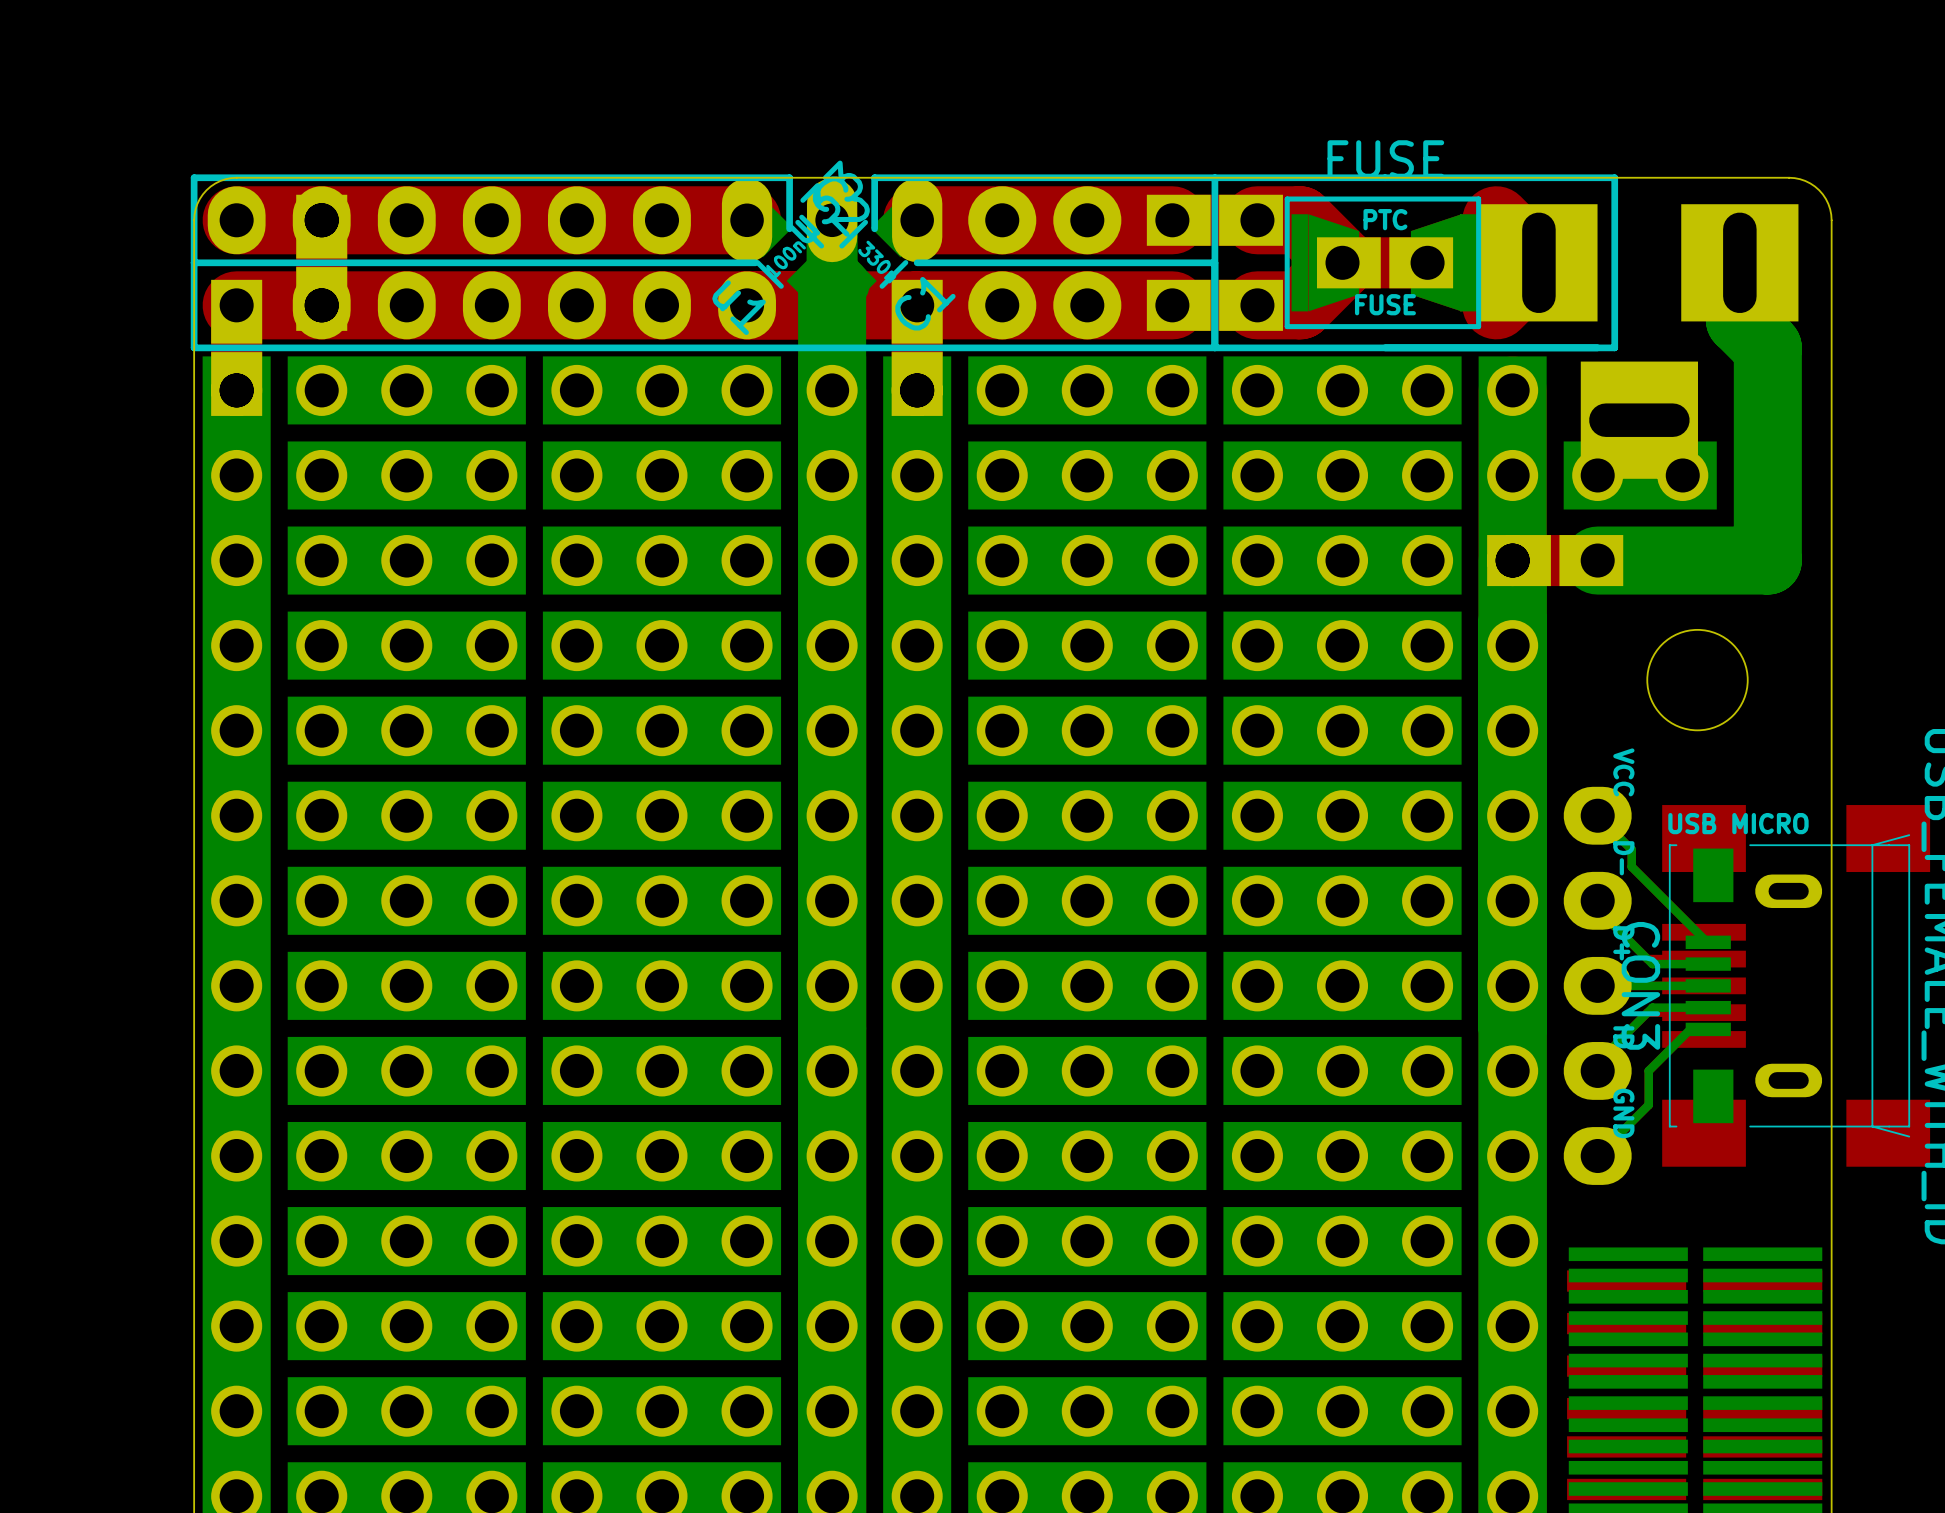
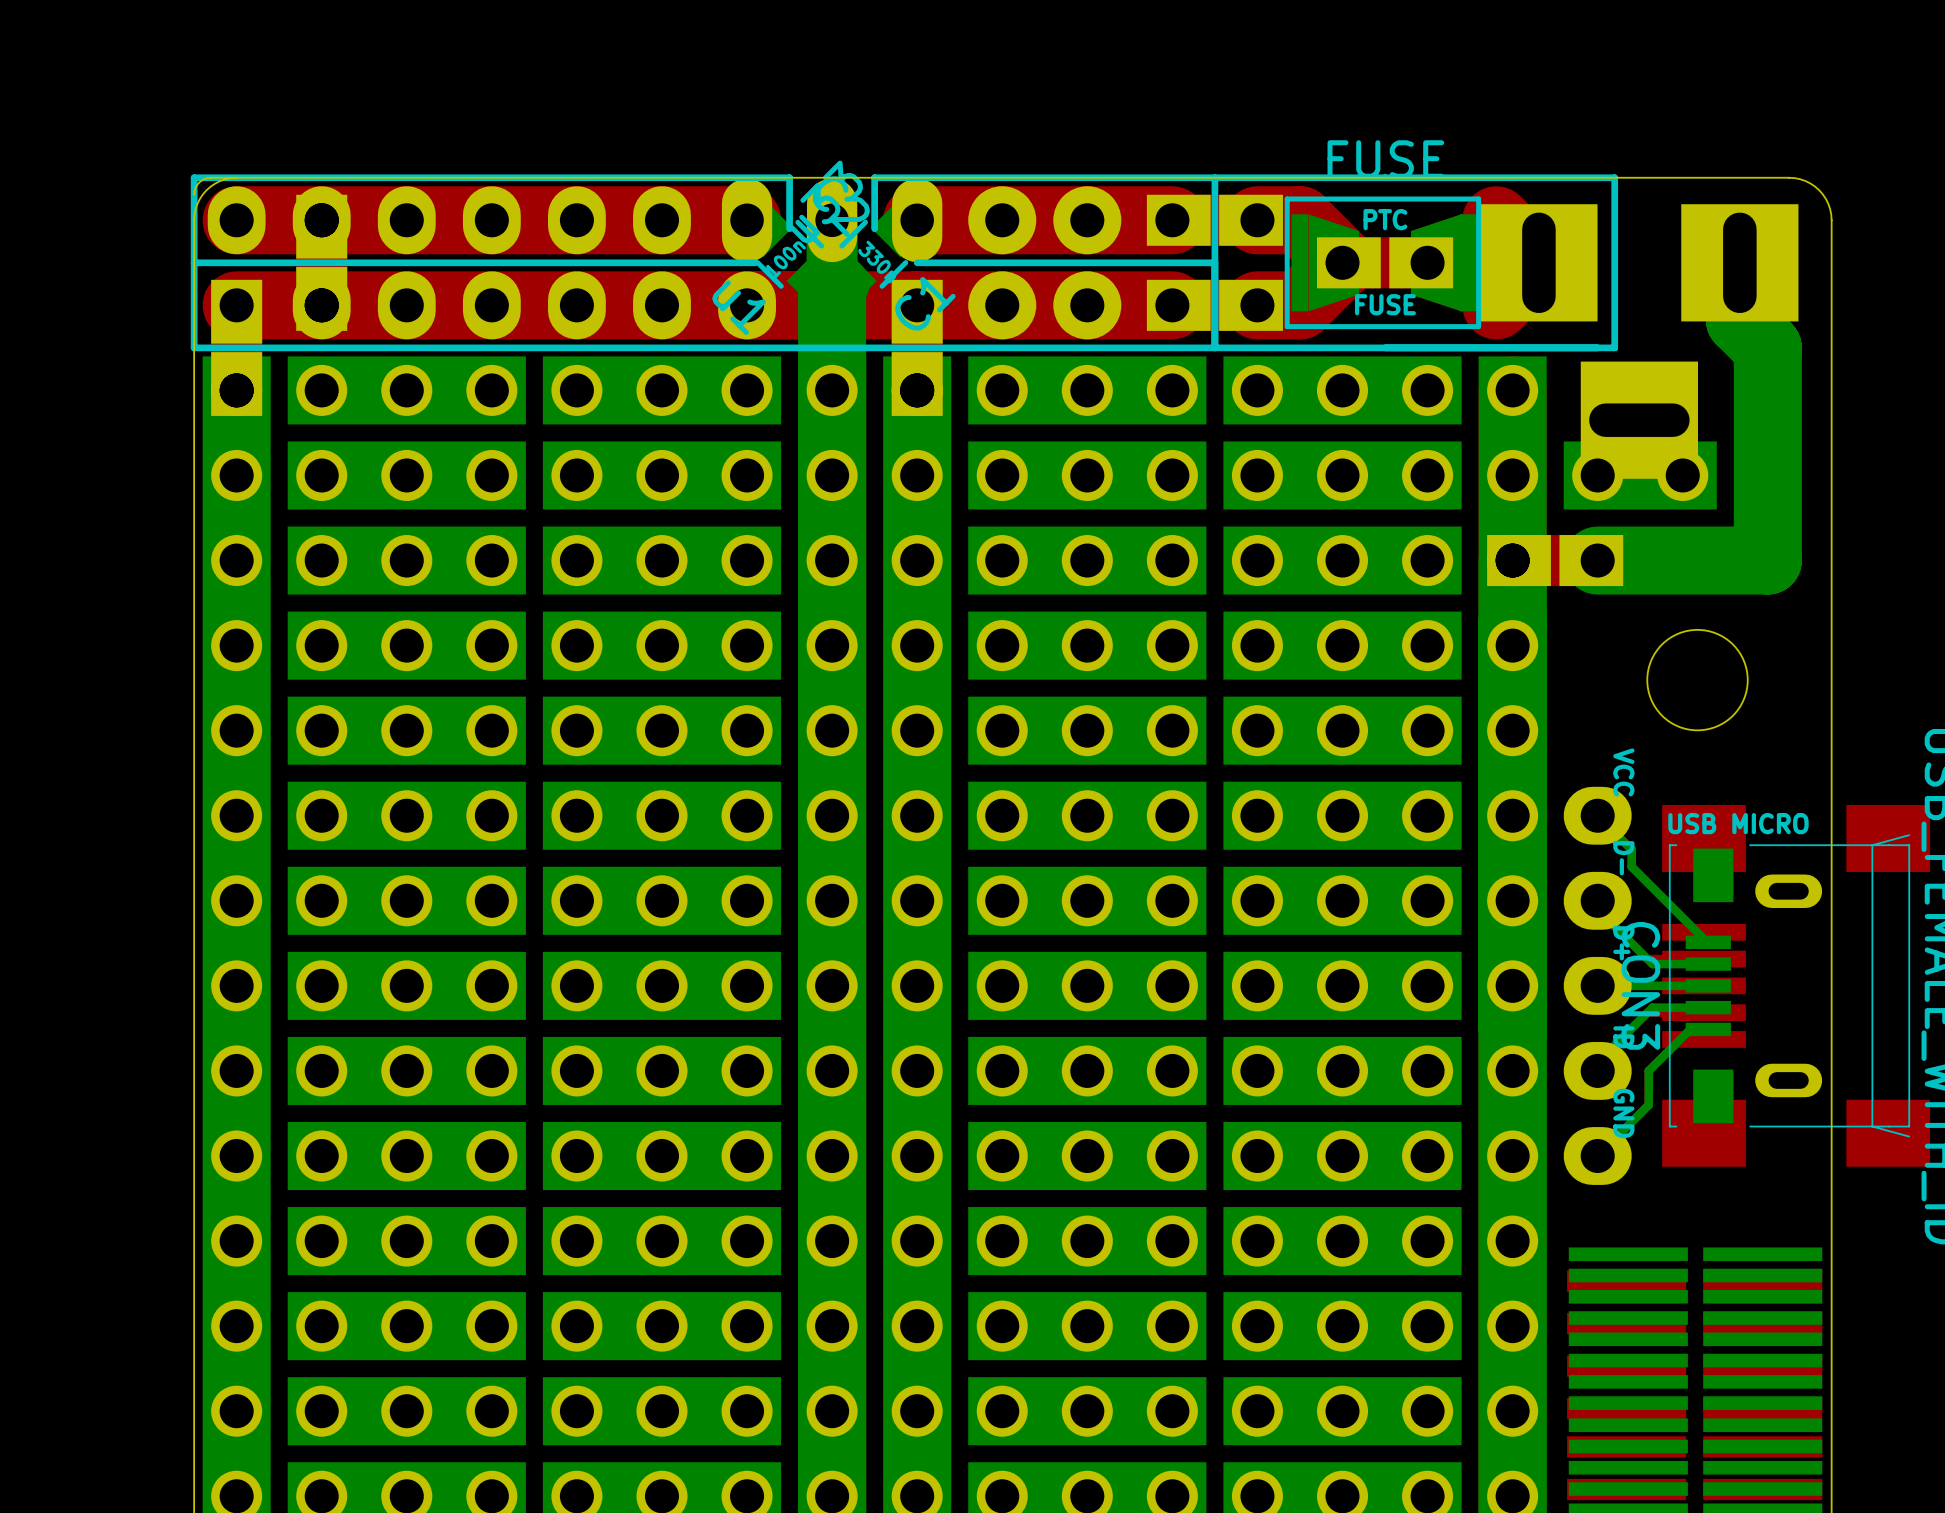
board edge: none -> (236, 177) (204, 179) (196, 186) (194, 194)

